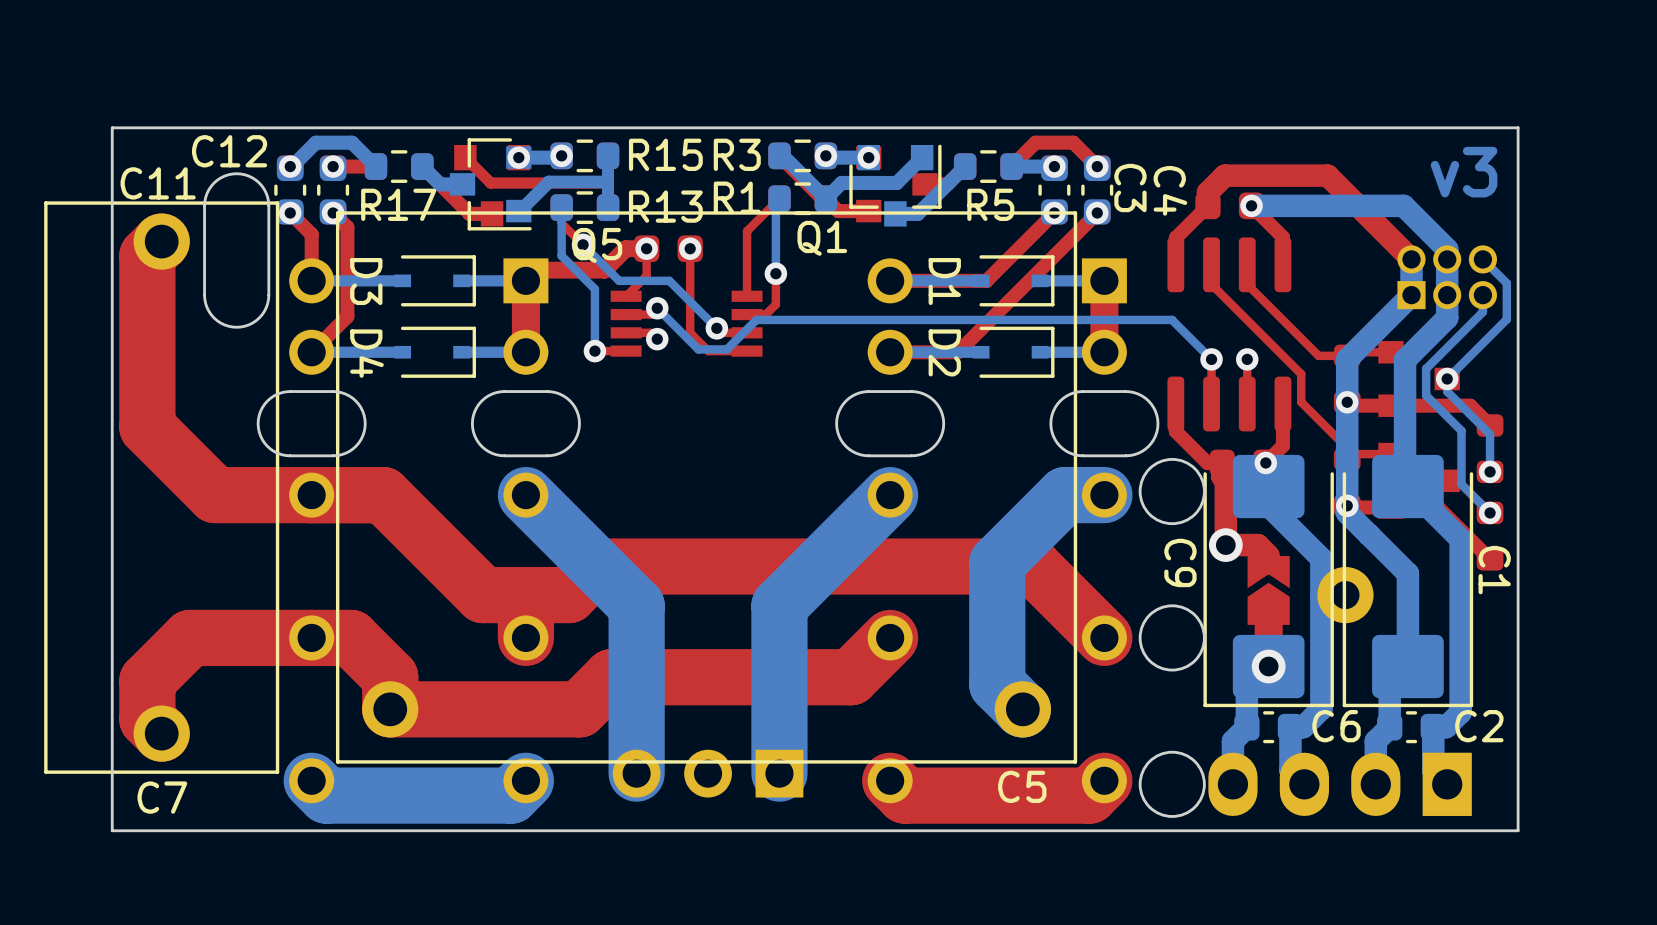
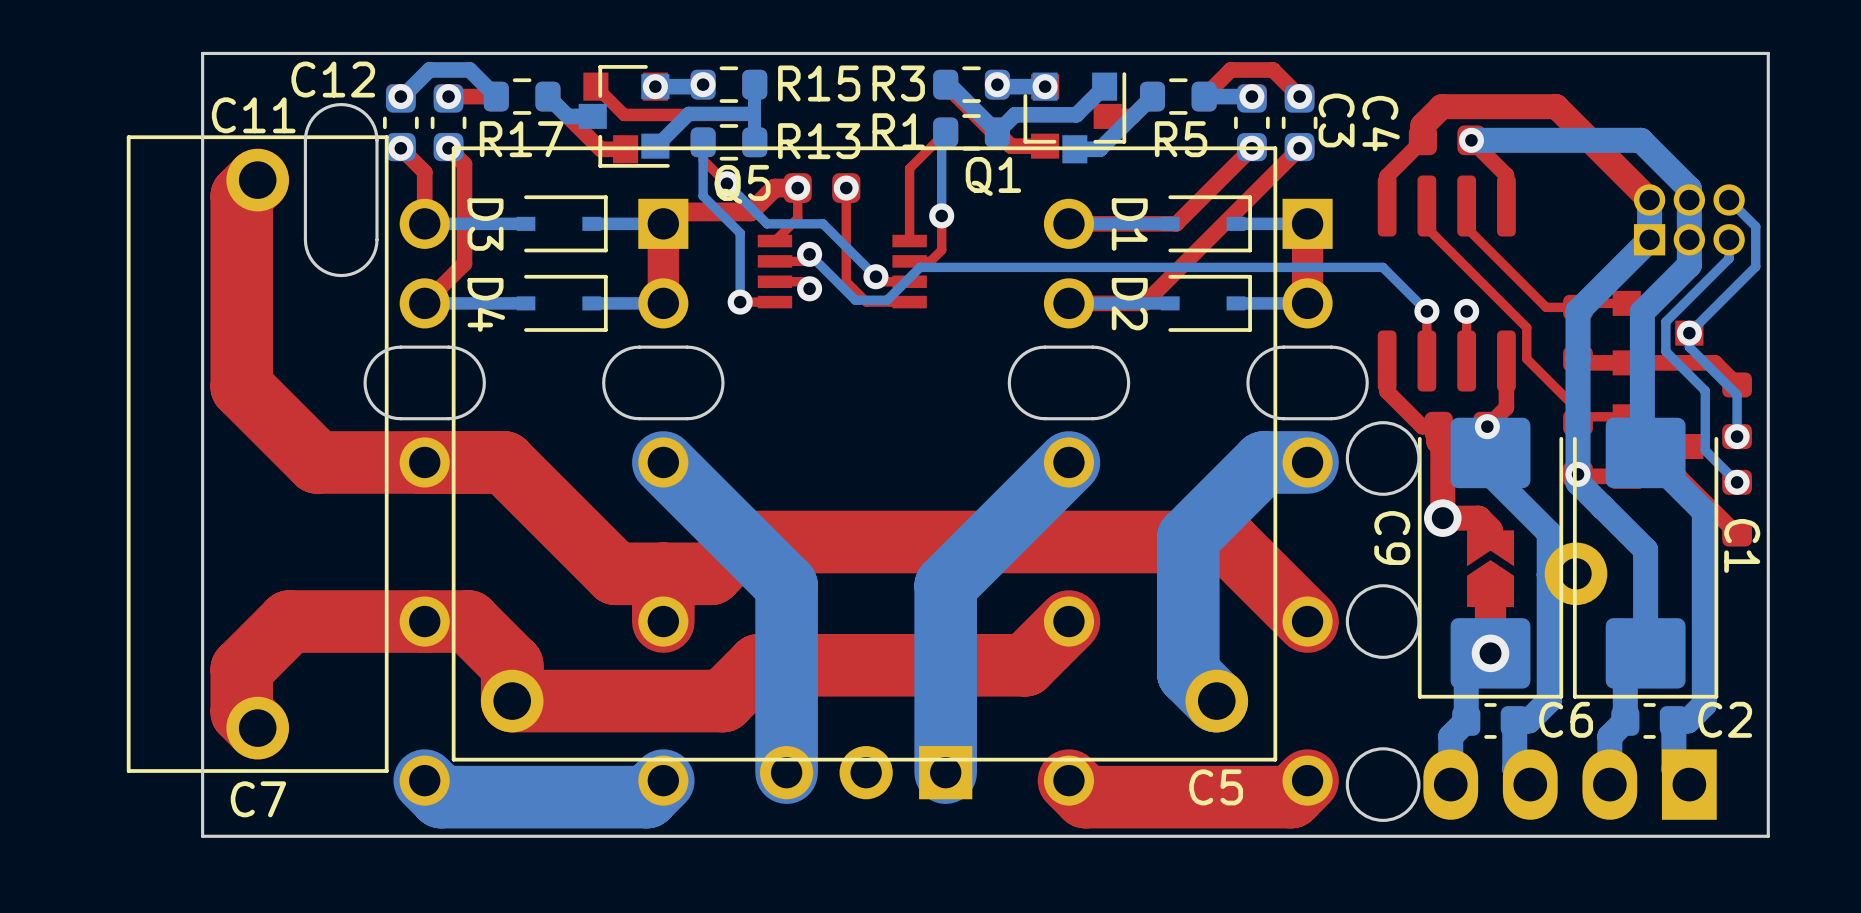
text: v3 (1464, 172) -> none
via: (1347, 402) -> none

